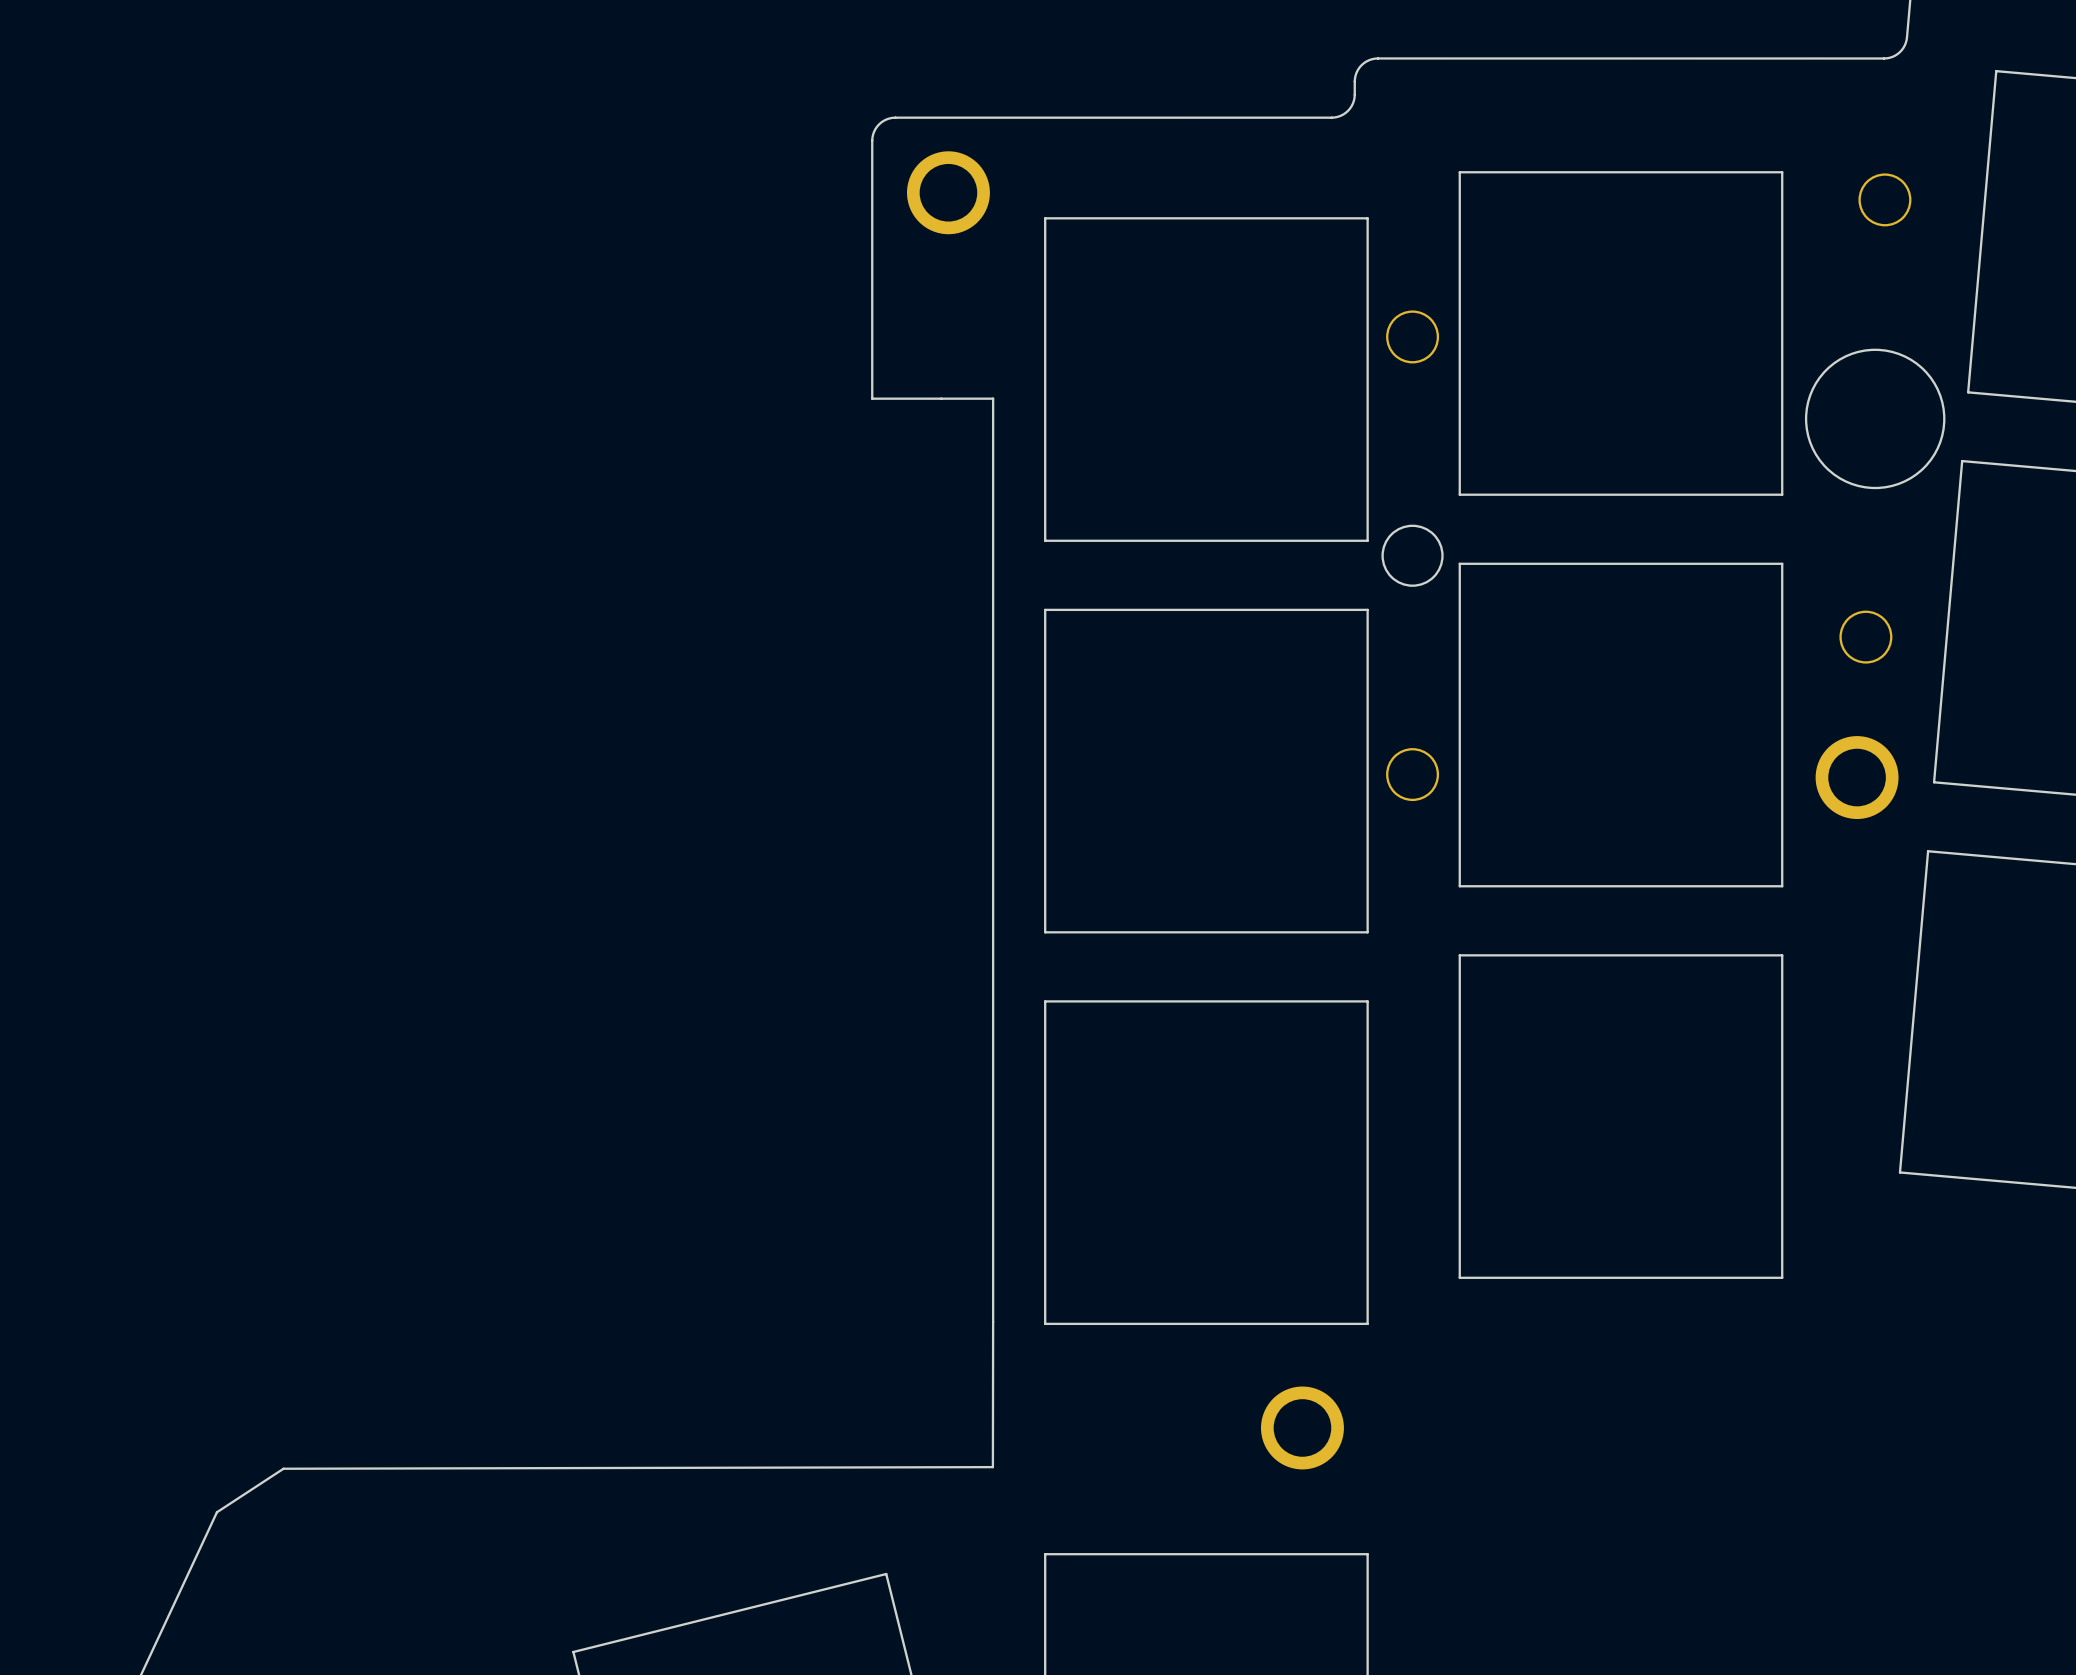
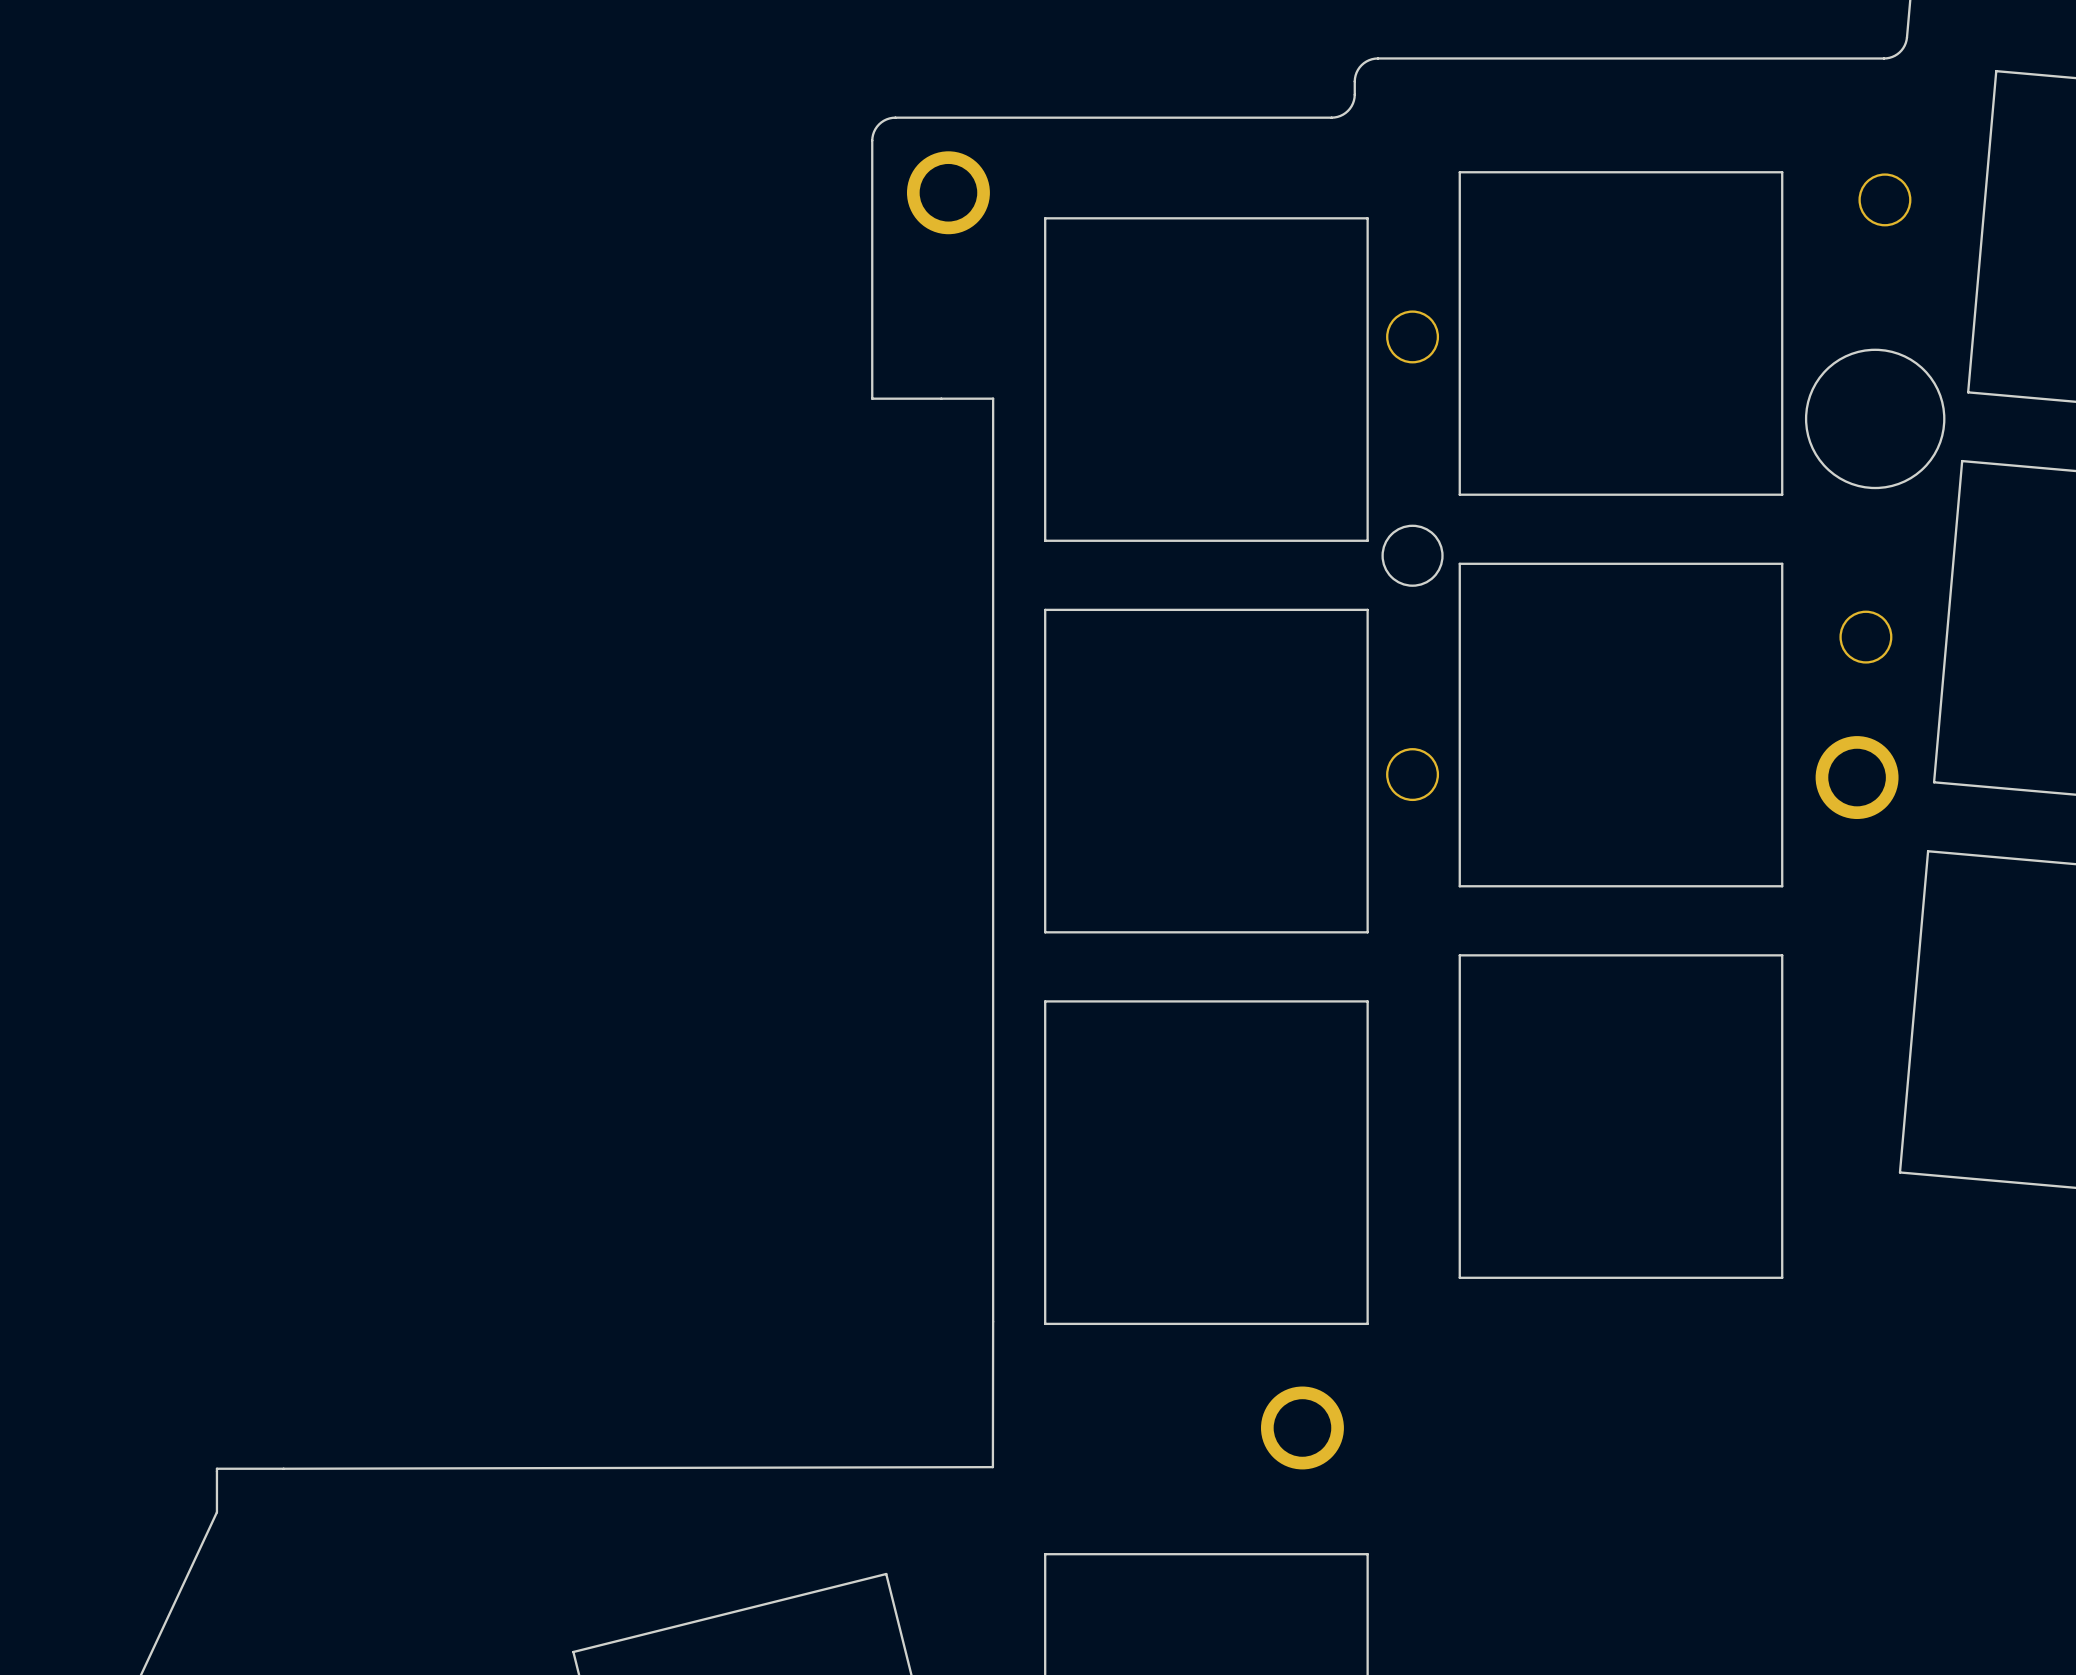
board edge: (283, 1468) (216, 1512) -> (283, 1468) (216, 1468) (216, 1512)

